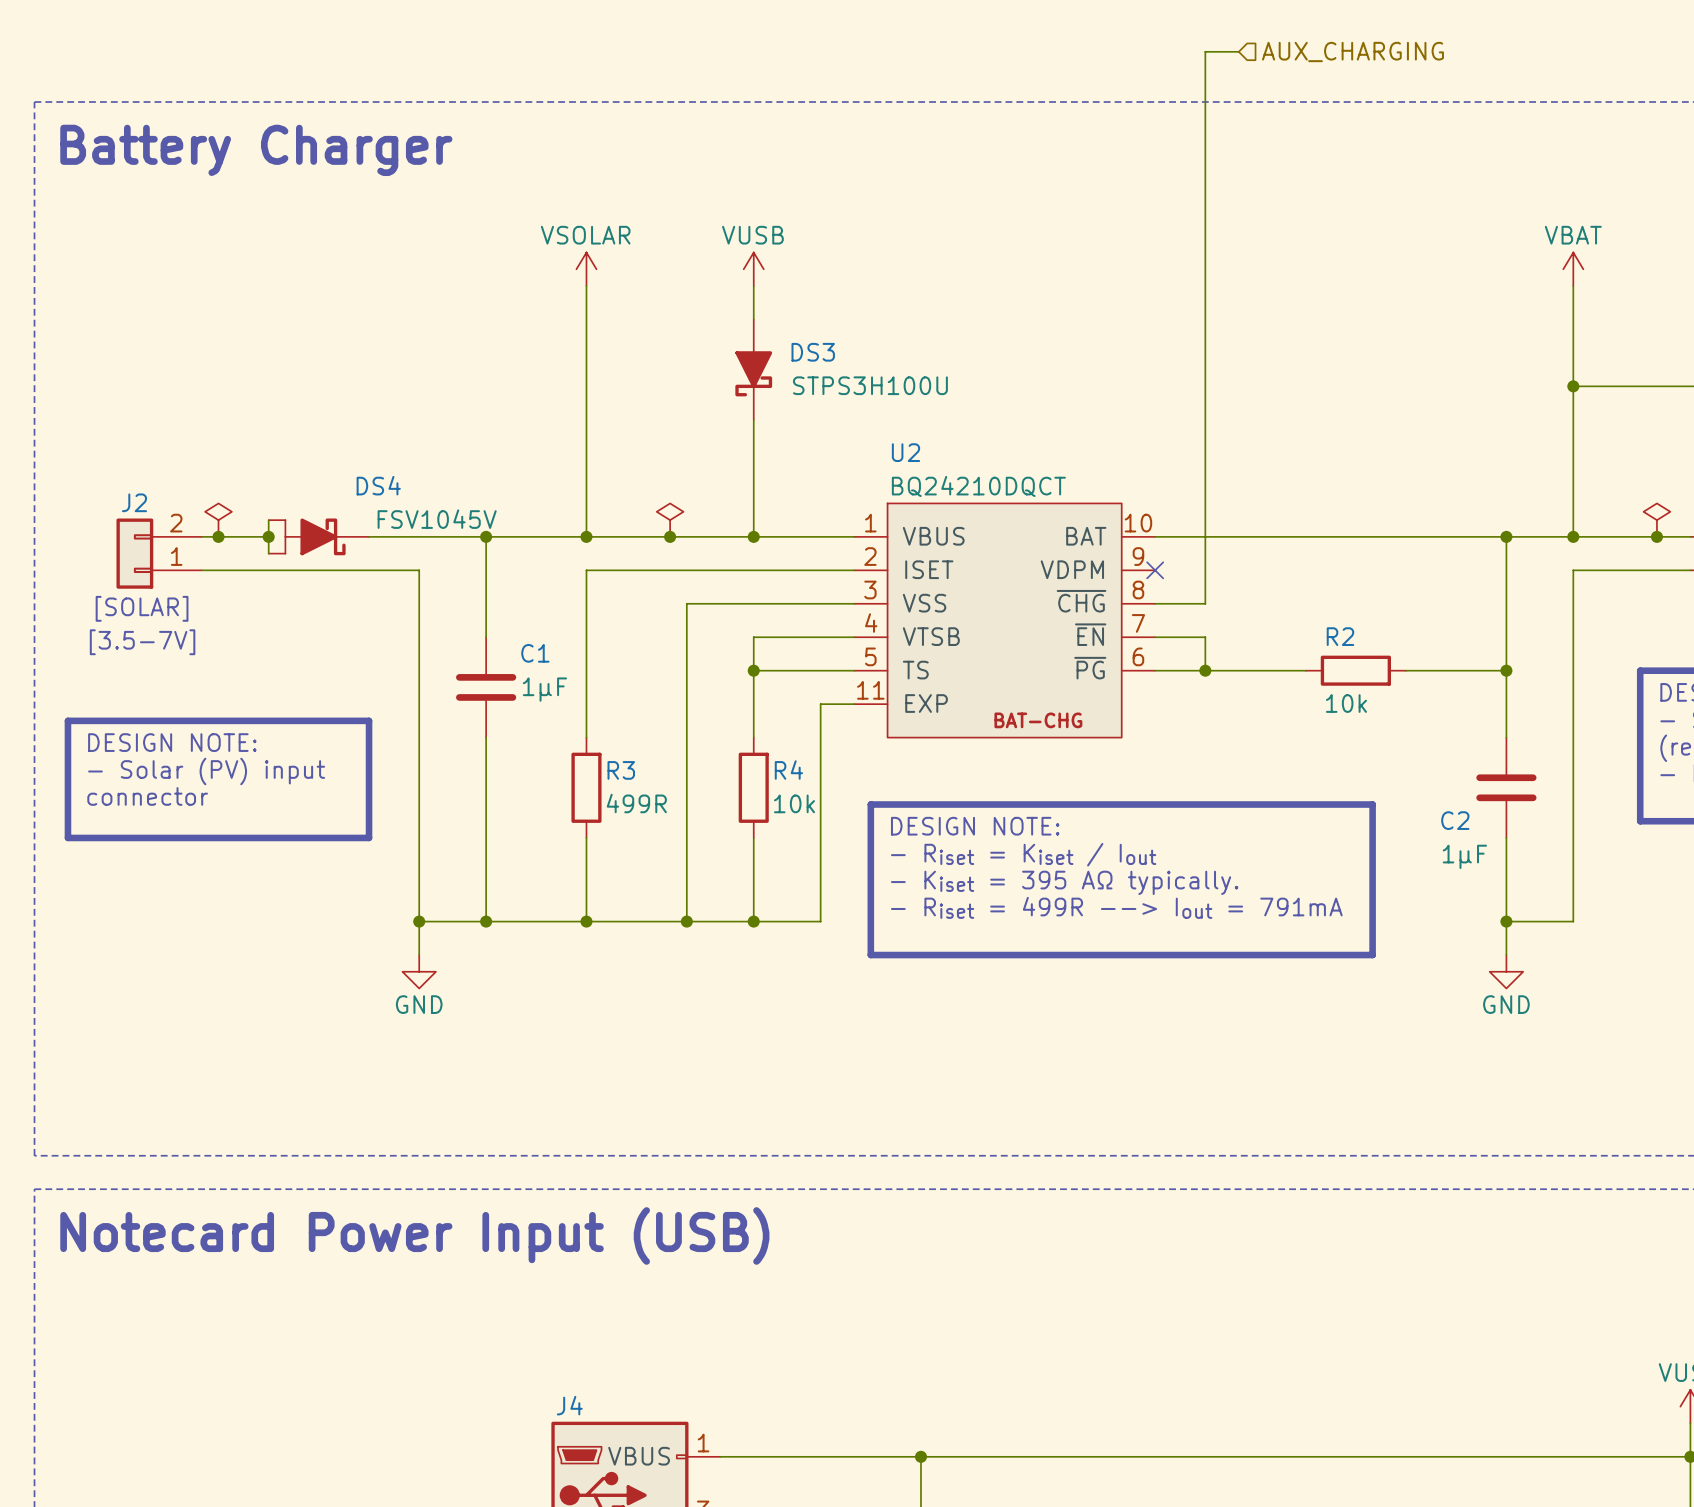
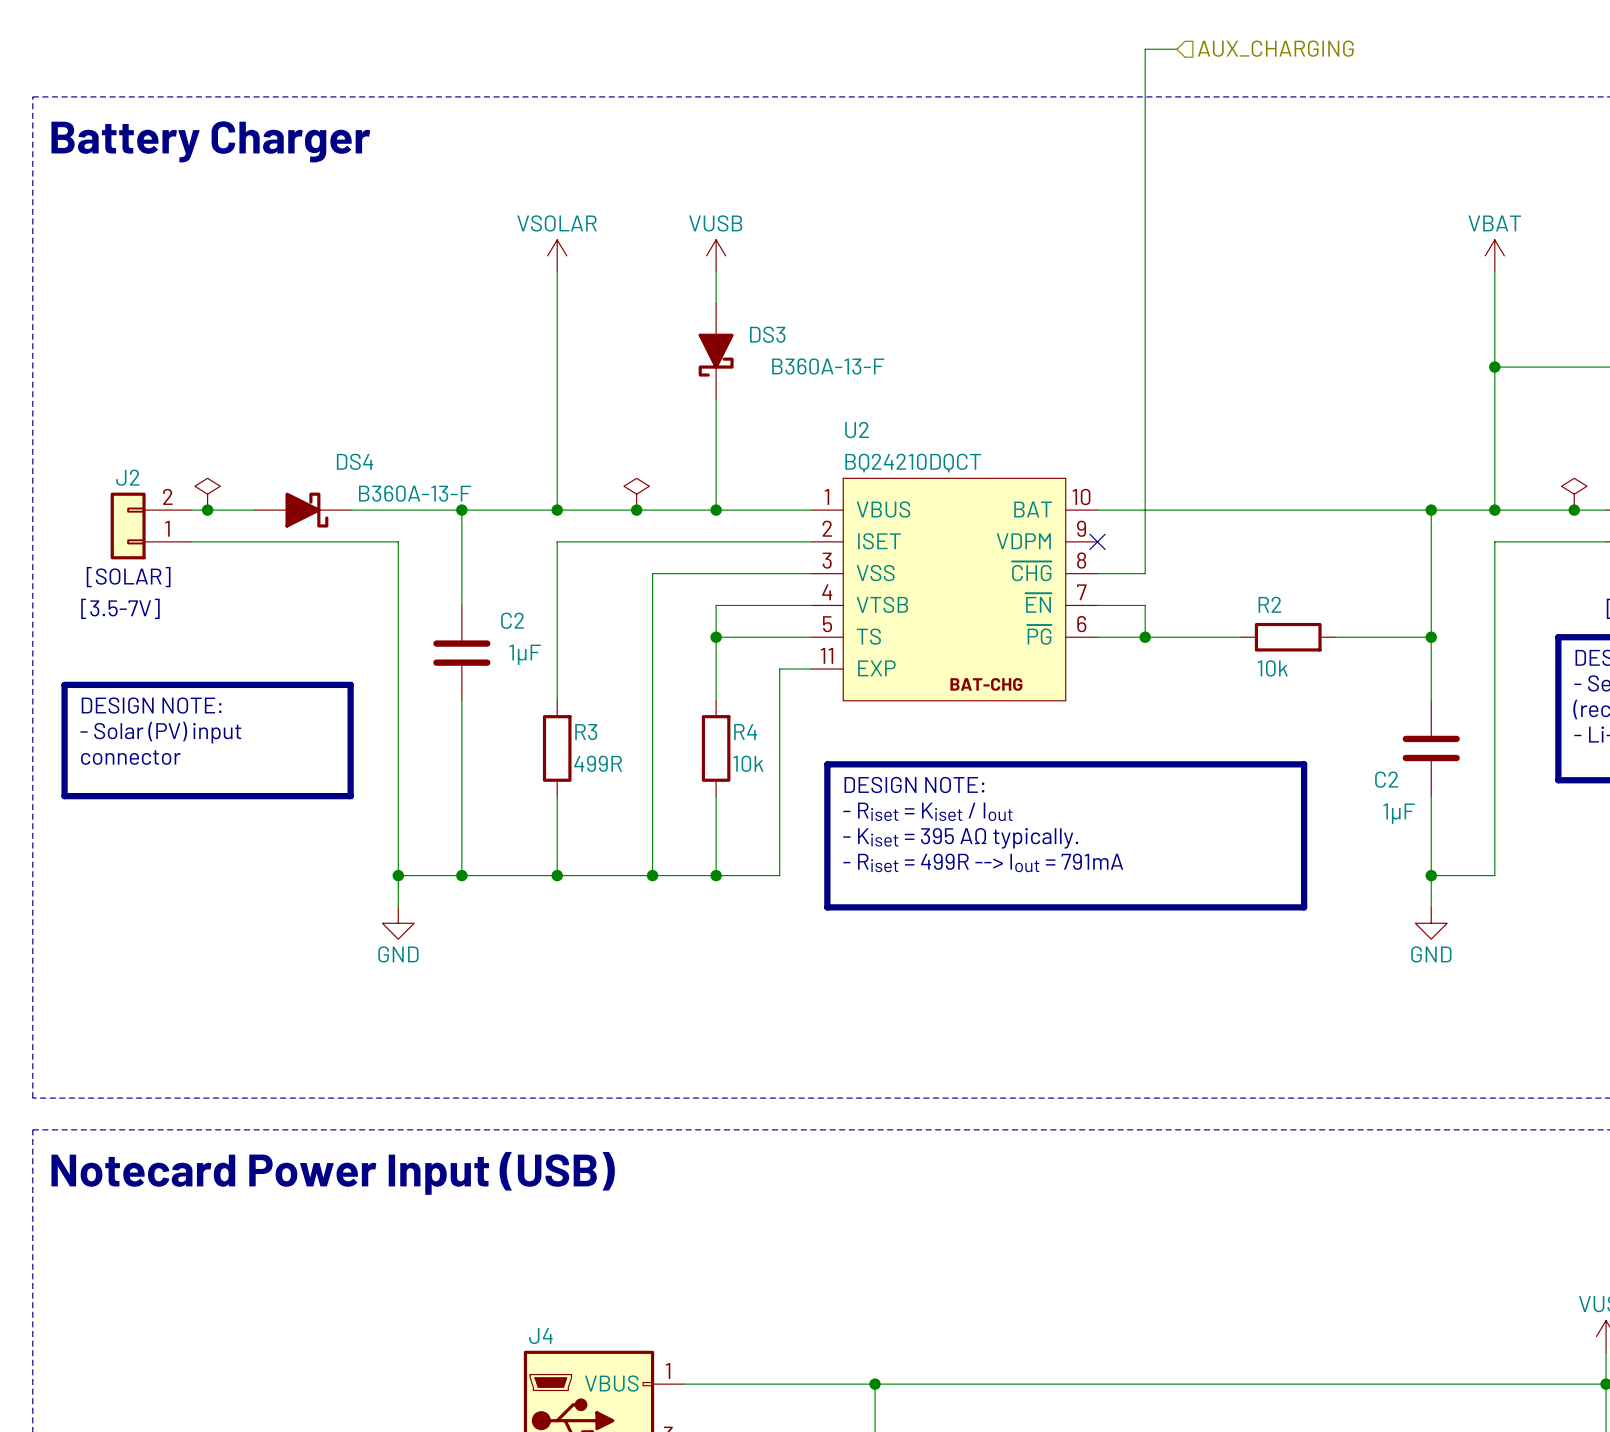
DS3 value: STPS3H100U (870, 385) -> B360A-13-F (828, 366)
DS4 symbol: [268, 518, 370, 556] -> [255, 492, 351, 528]
DS4 value: FSV1045V (437, 519) -> B360A-13-F (415, 493)
wire: (268, 520) (268, 553) -> none
junction: (268, 536) -> none
C1 name: C1 (535, 653) -> C2 (512, 620)

